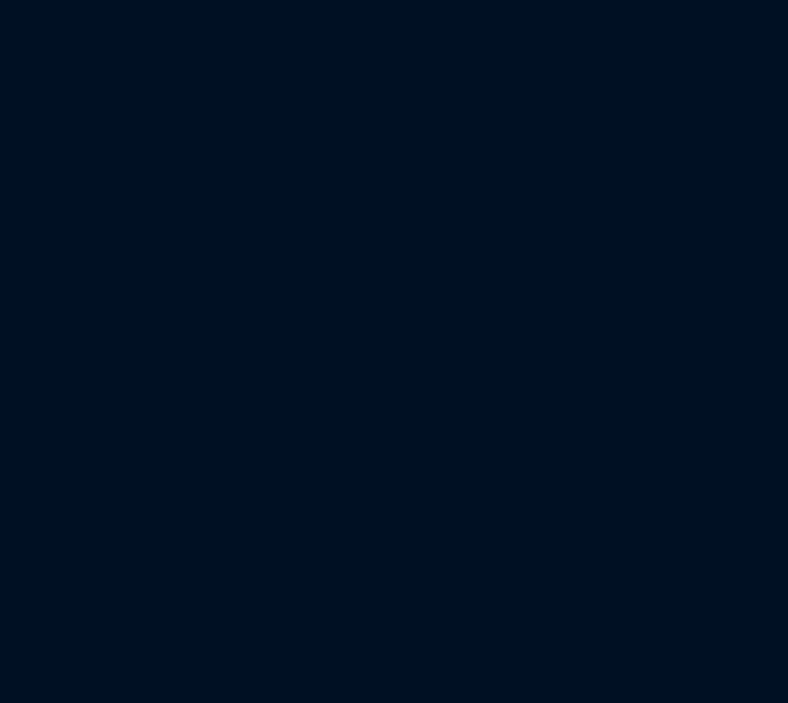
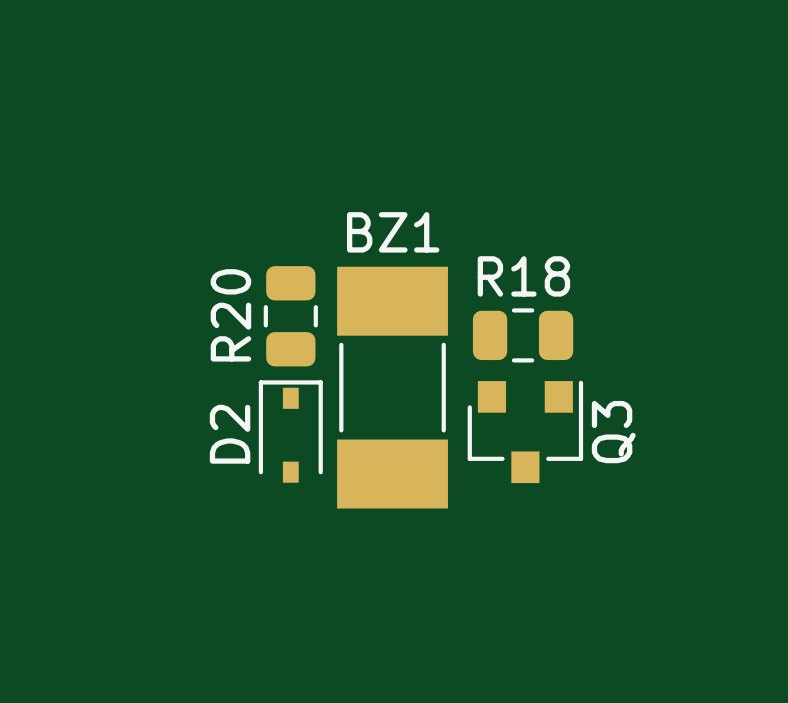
R20: none -> (290, 316)
R18: none -> (523, 335)
BZ1: none -> (392, 387)
D2: none -> (290, 431)
Q3: none -> (525, 431)

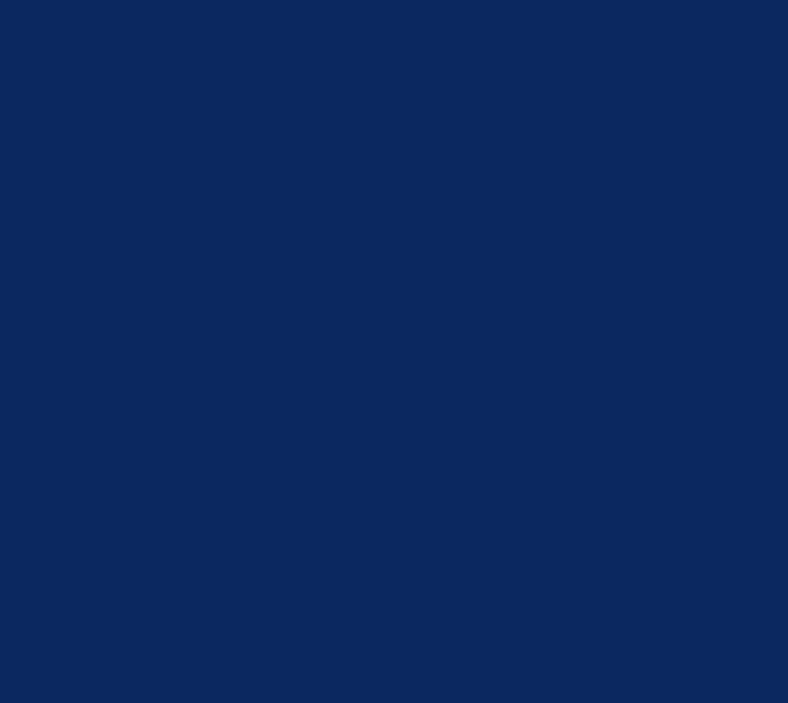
R20: (290, 316) -> none
R18: (523, 335) -> none
BZ1: (392, 387) -> none
D2: (290, 431) -> none
Q3: (525, 431) -> none

